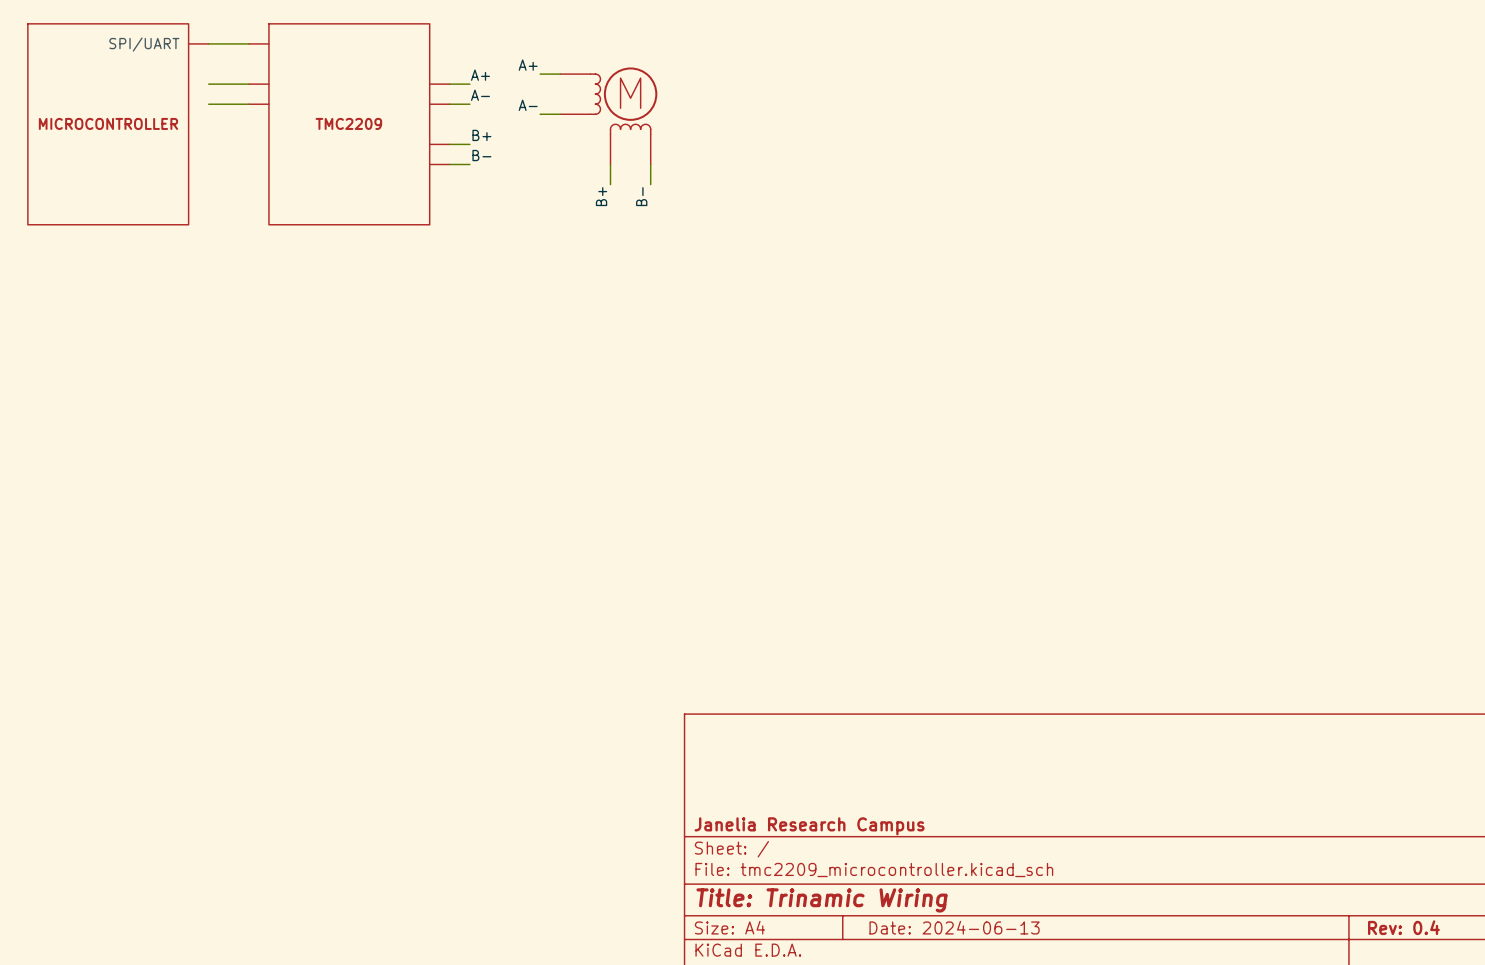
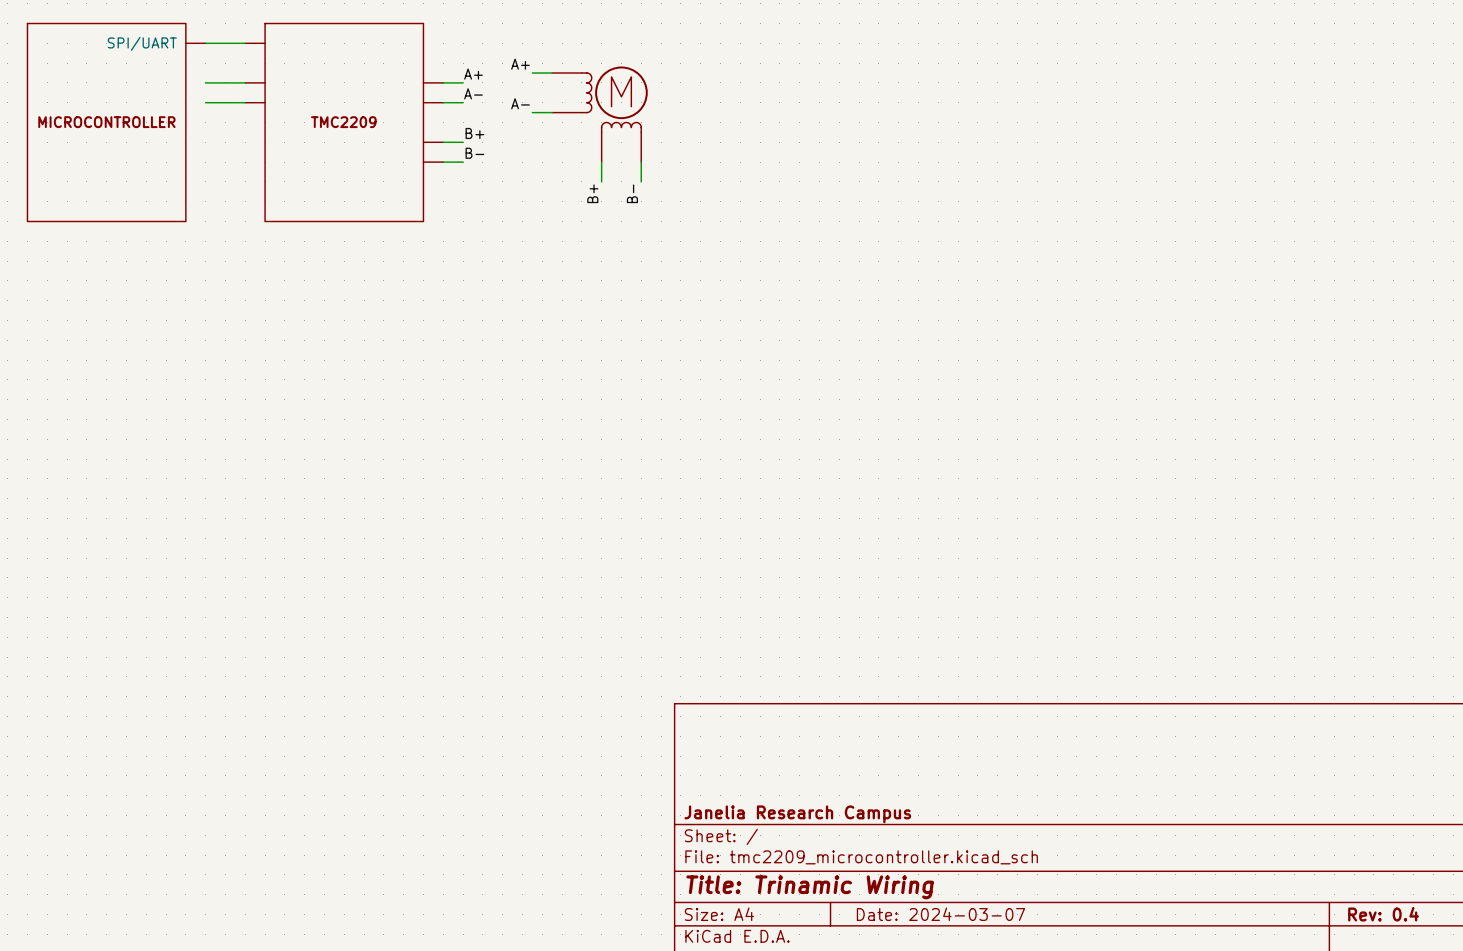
title block: Date: 2024-06-13 (954, 927) -> Date: 2024-03-07 (940, 914)

